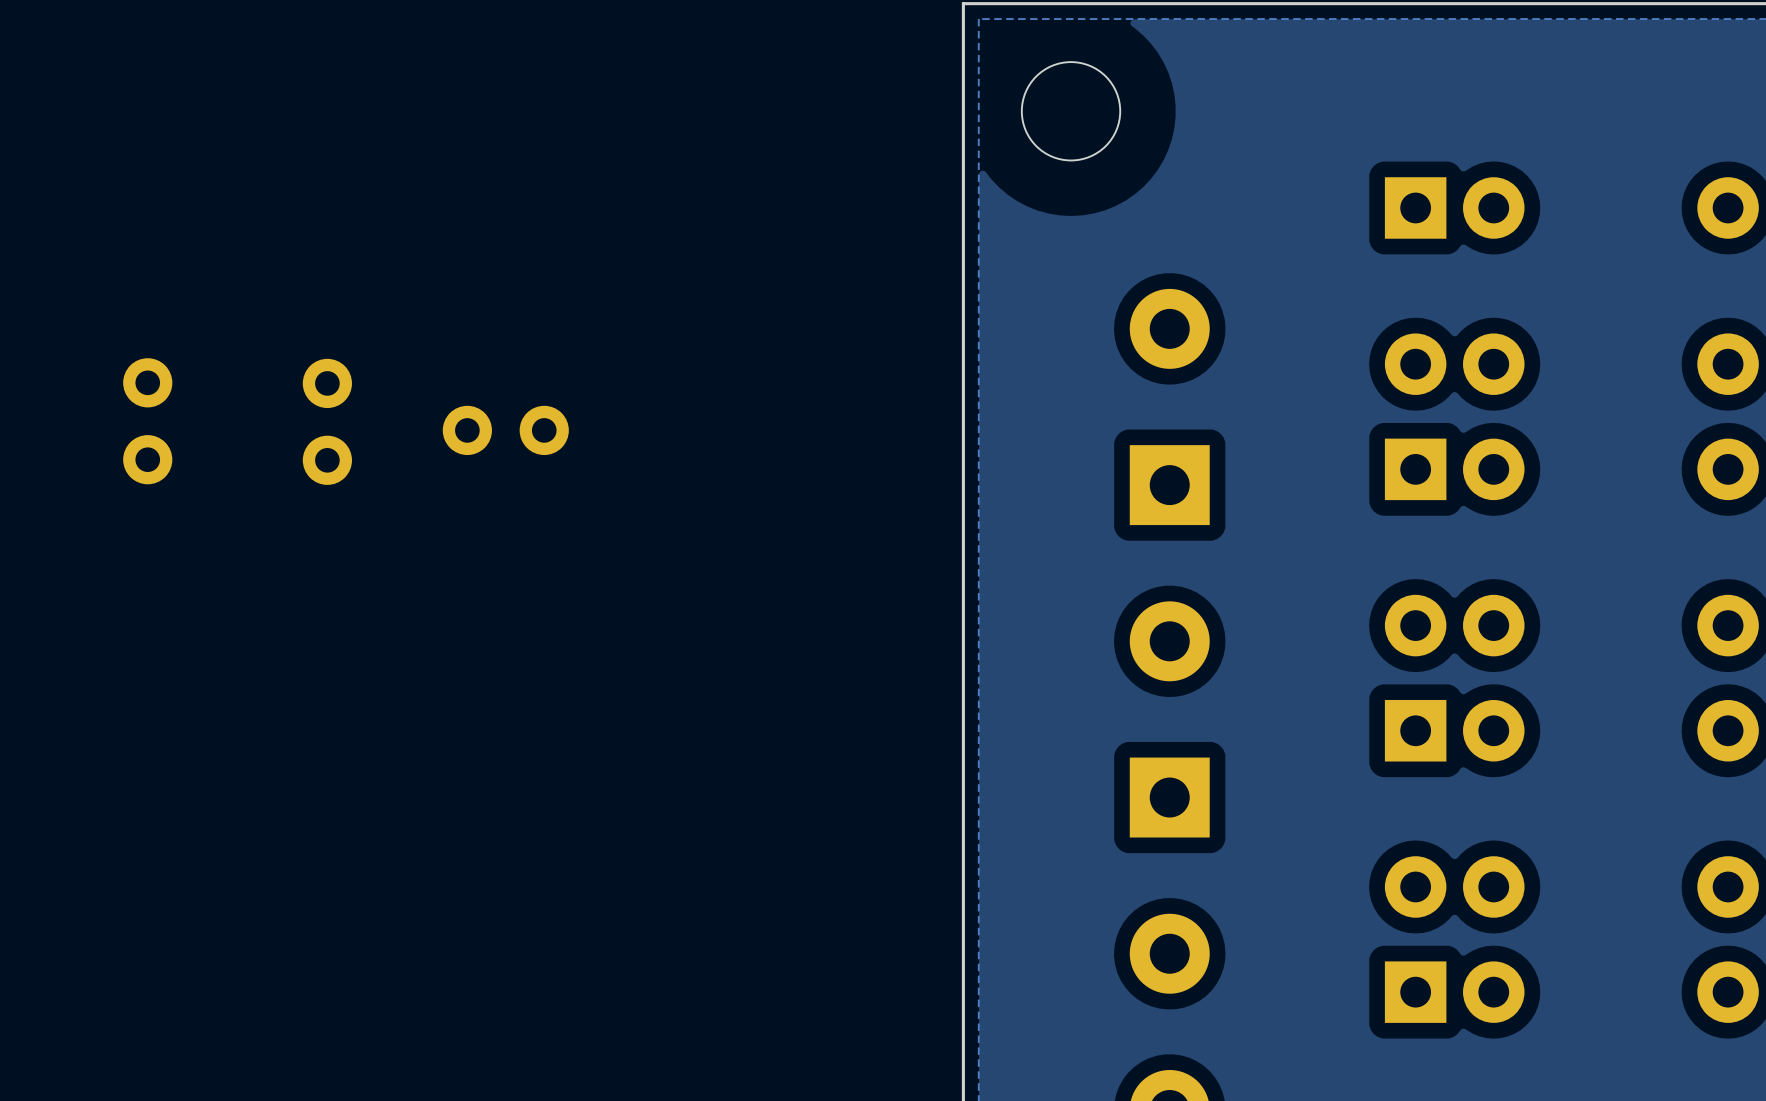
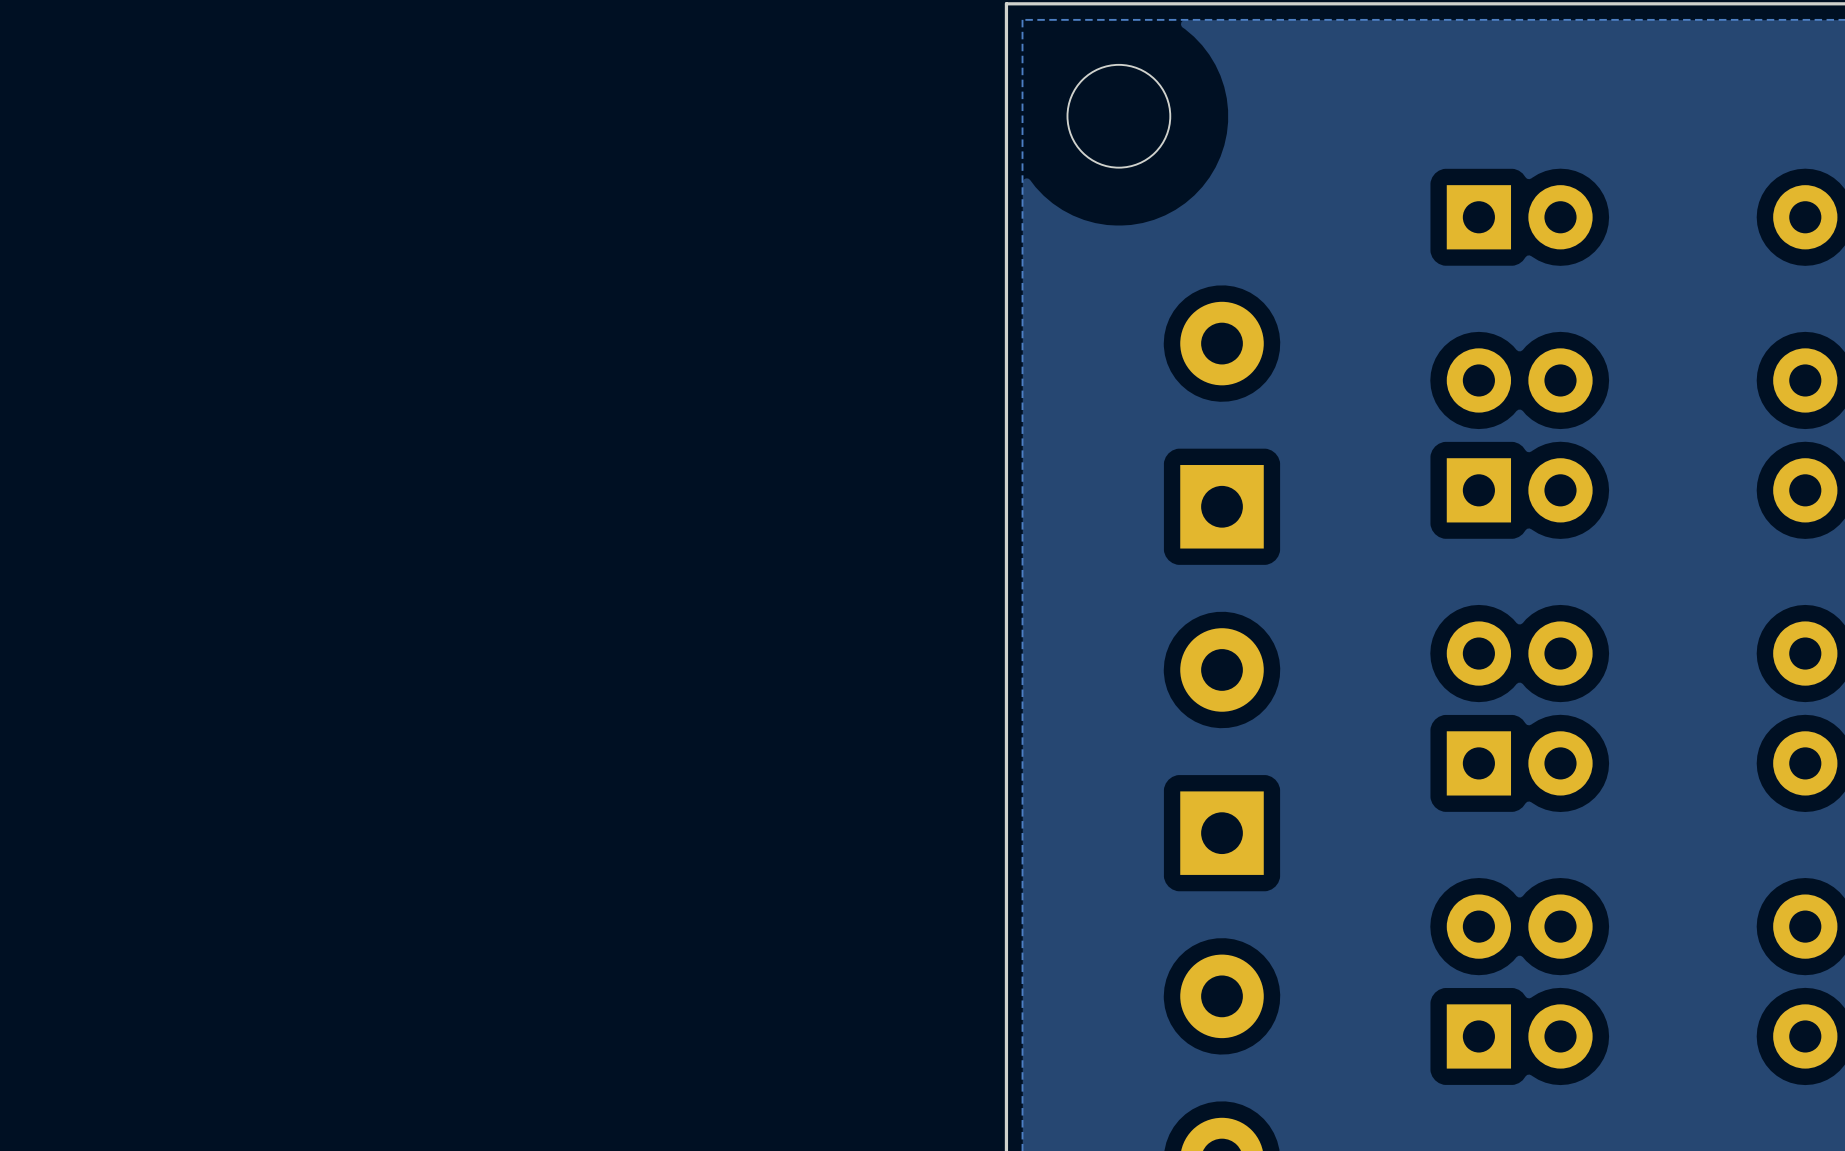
part: (147, 421) -> none
part: (327, 421) -> none
part: (505, 430) -> none

